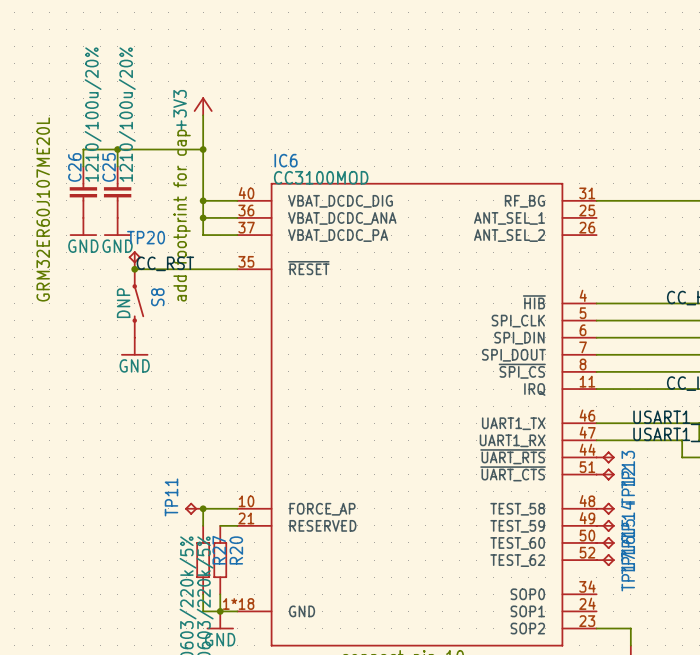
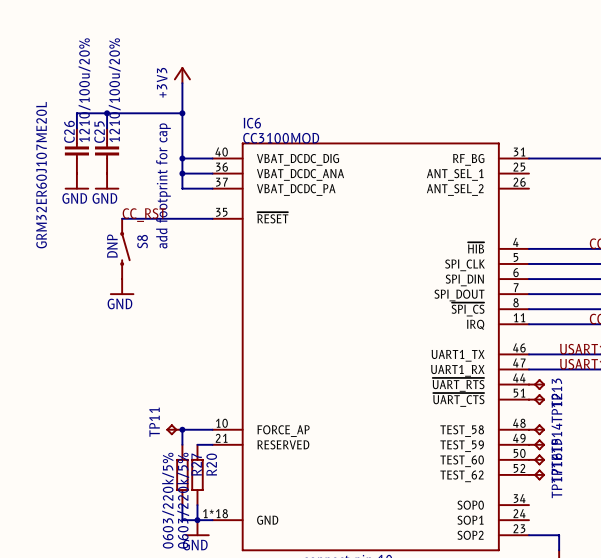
TP20: (134, 260) -> none
junction: (134, 269) -> none

